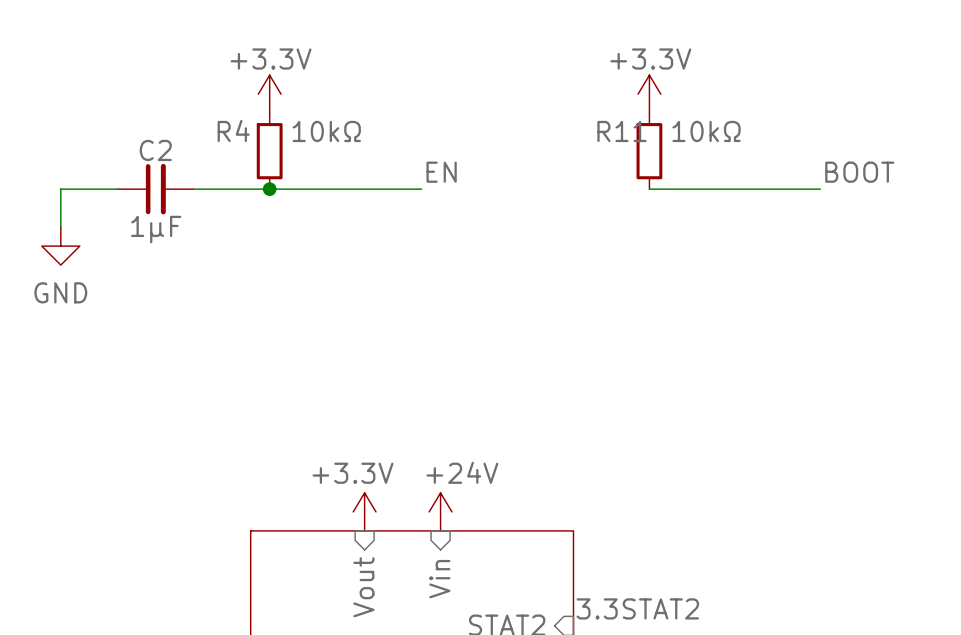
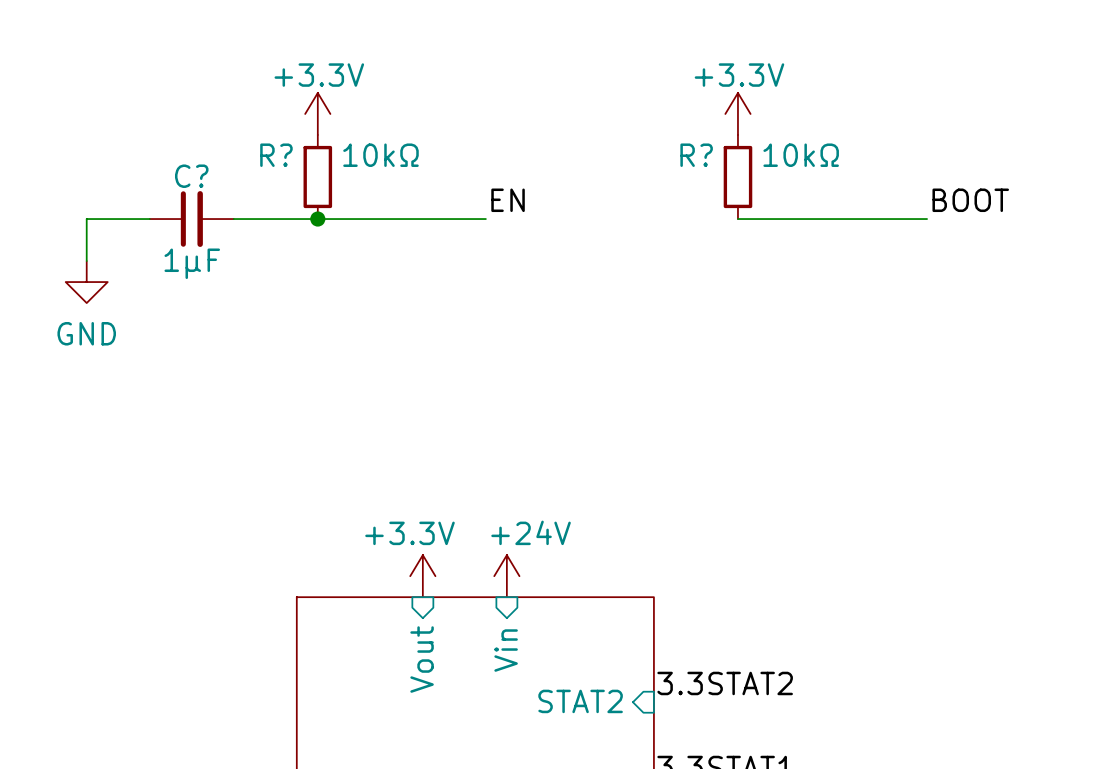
R4 name: R4 (233, 131) -> R? (276, 155)
R11 name: R11 (622, 131) -> R? (696, 155)
C2 name: C2 (155, 150) -> C? (191, 176)

